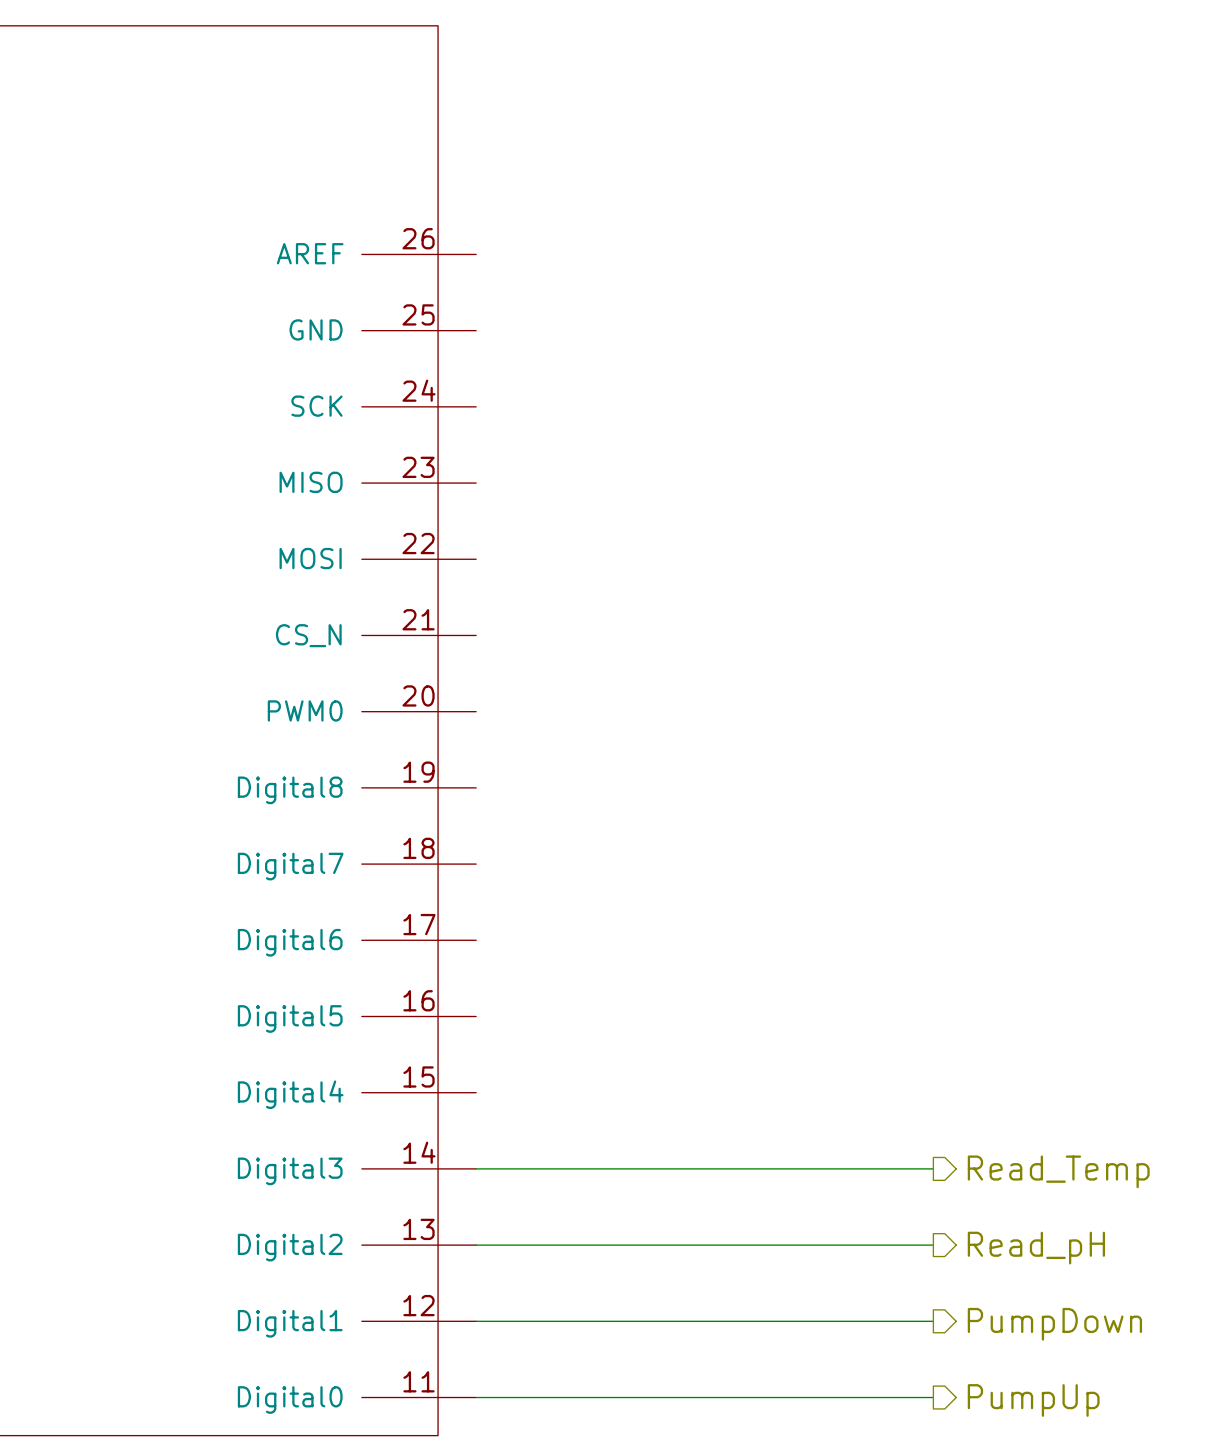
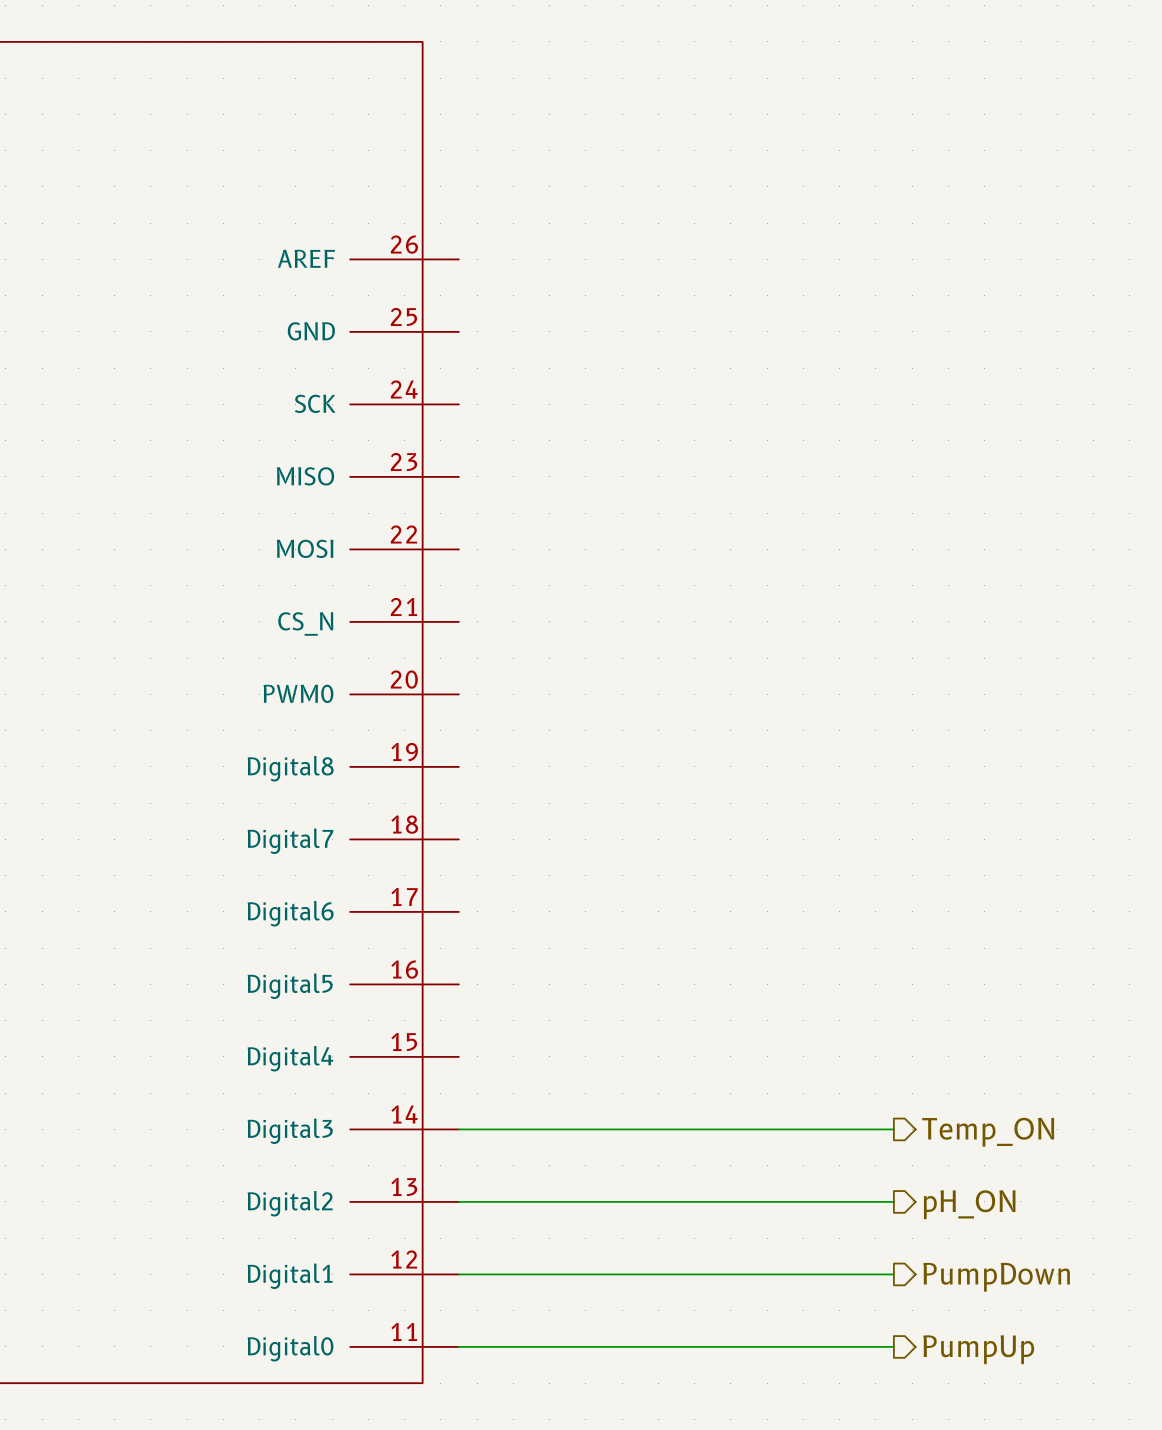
hierarchical label: Read_Temp (1058, 1171) -> Temp_ON (988, 1132)
hierarchical label: Read_pH (1036, 1248) -> pH_ON (969, 1204)

